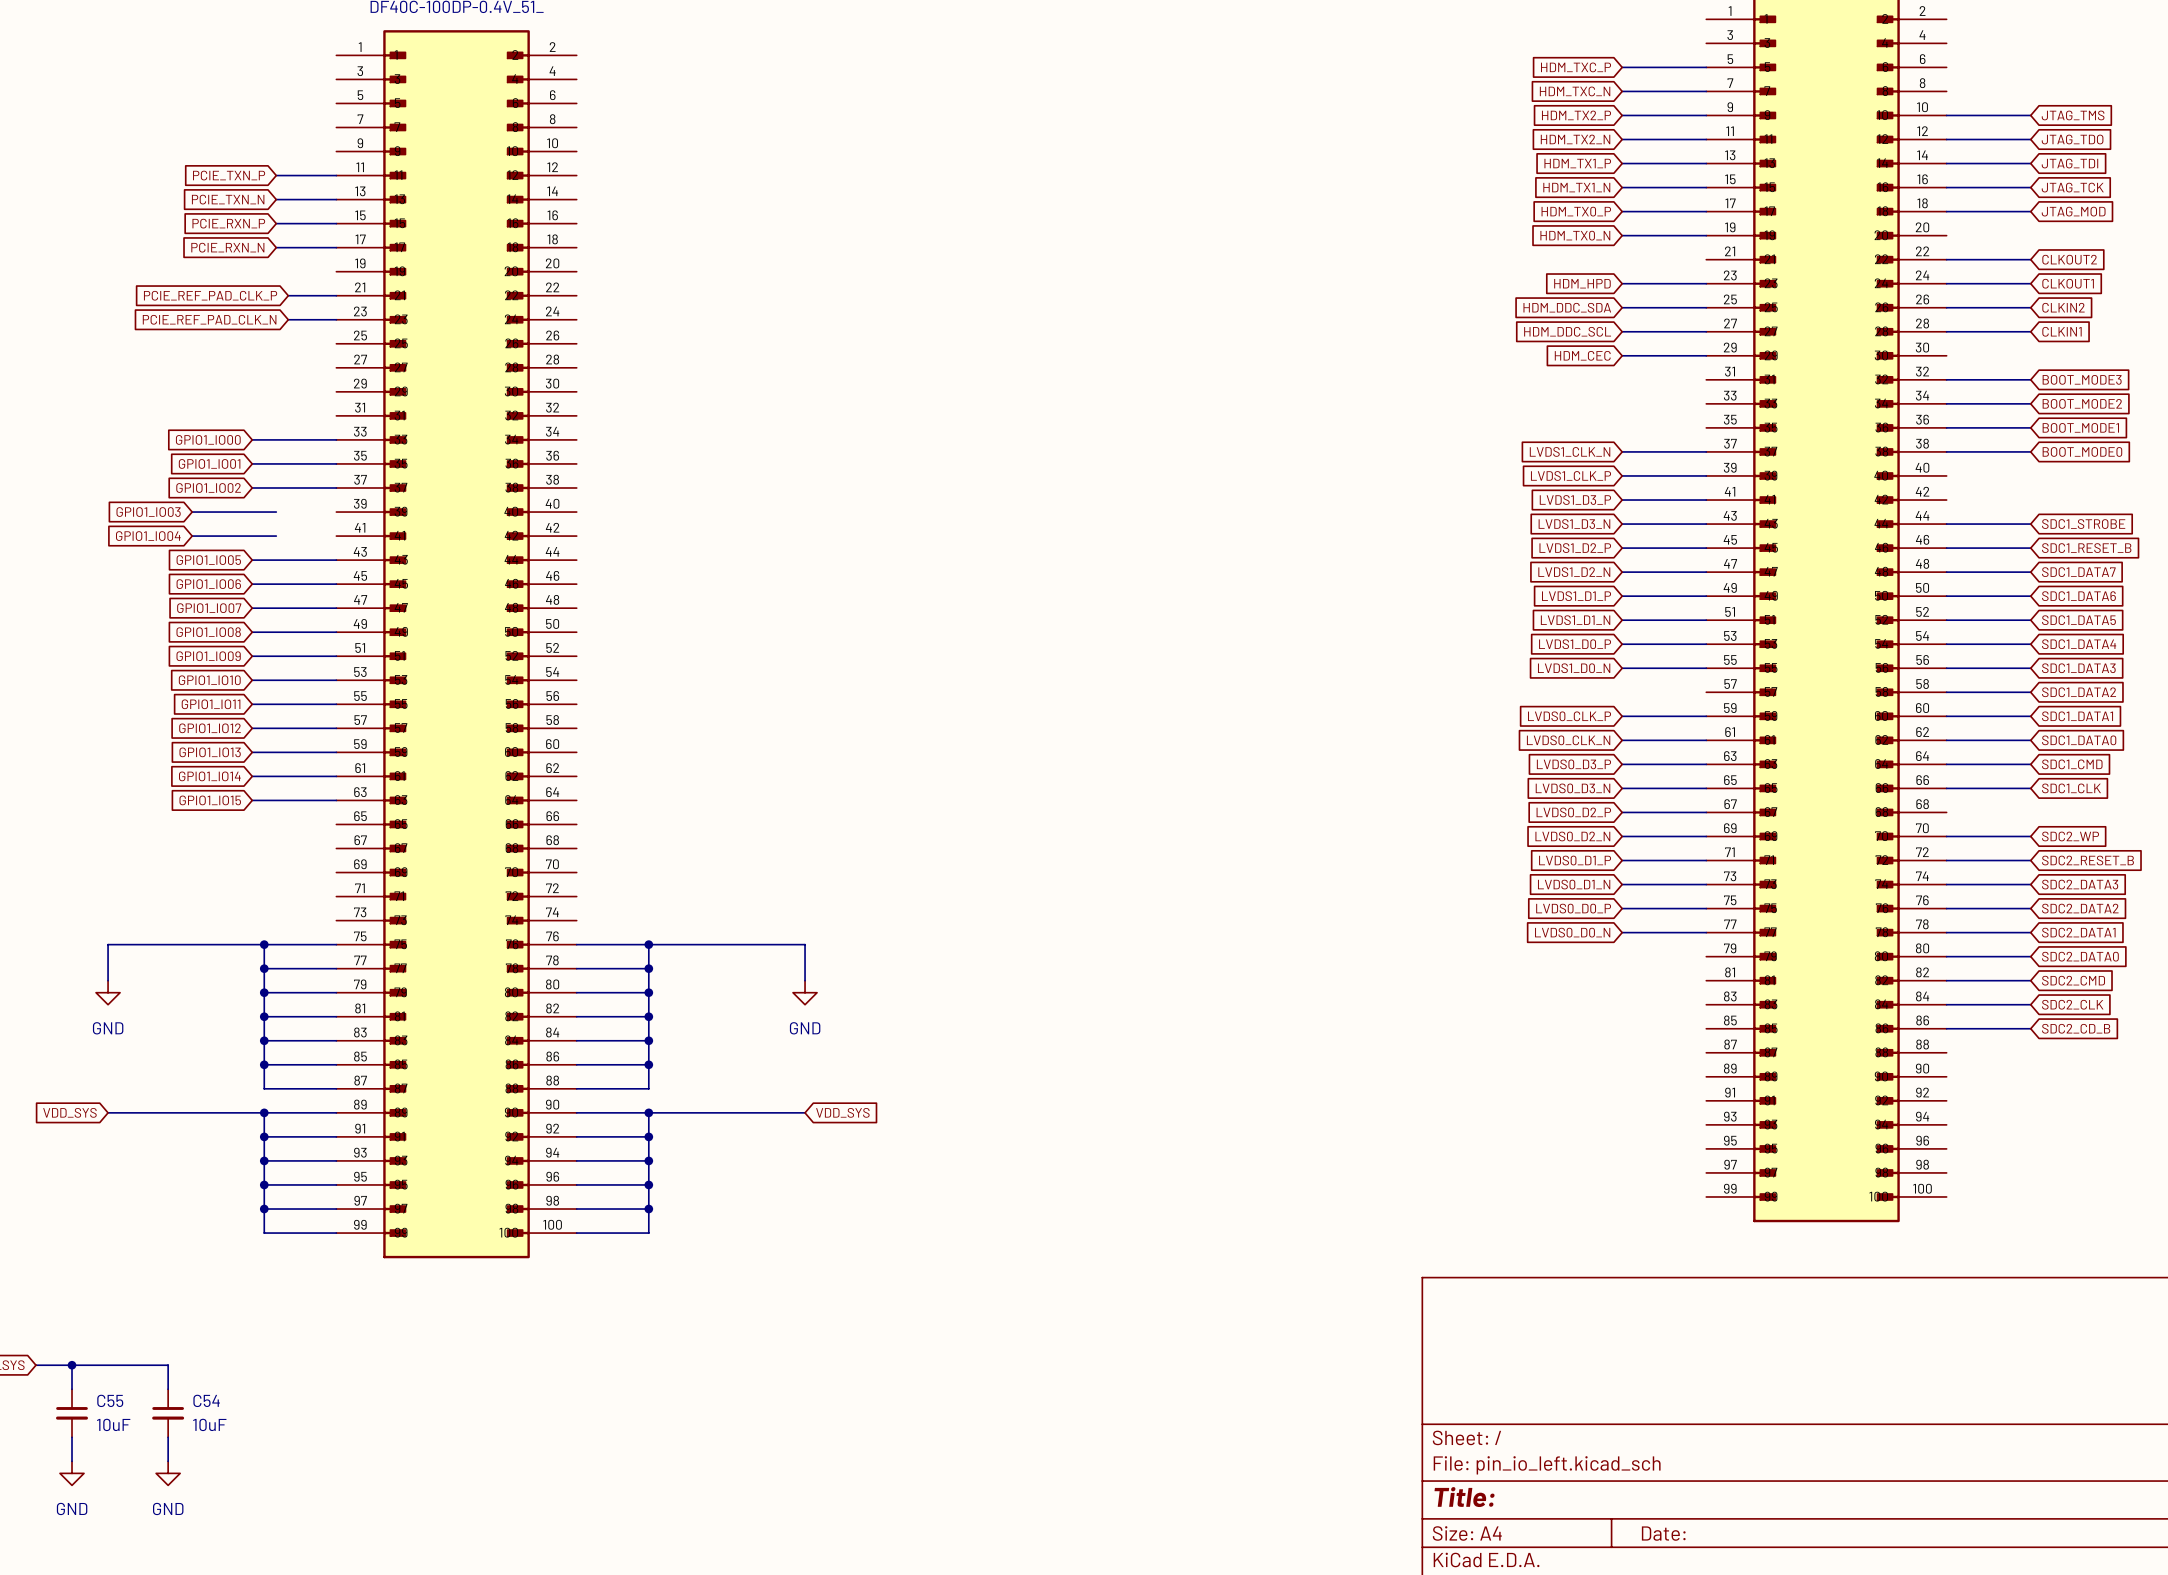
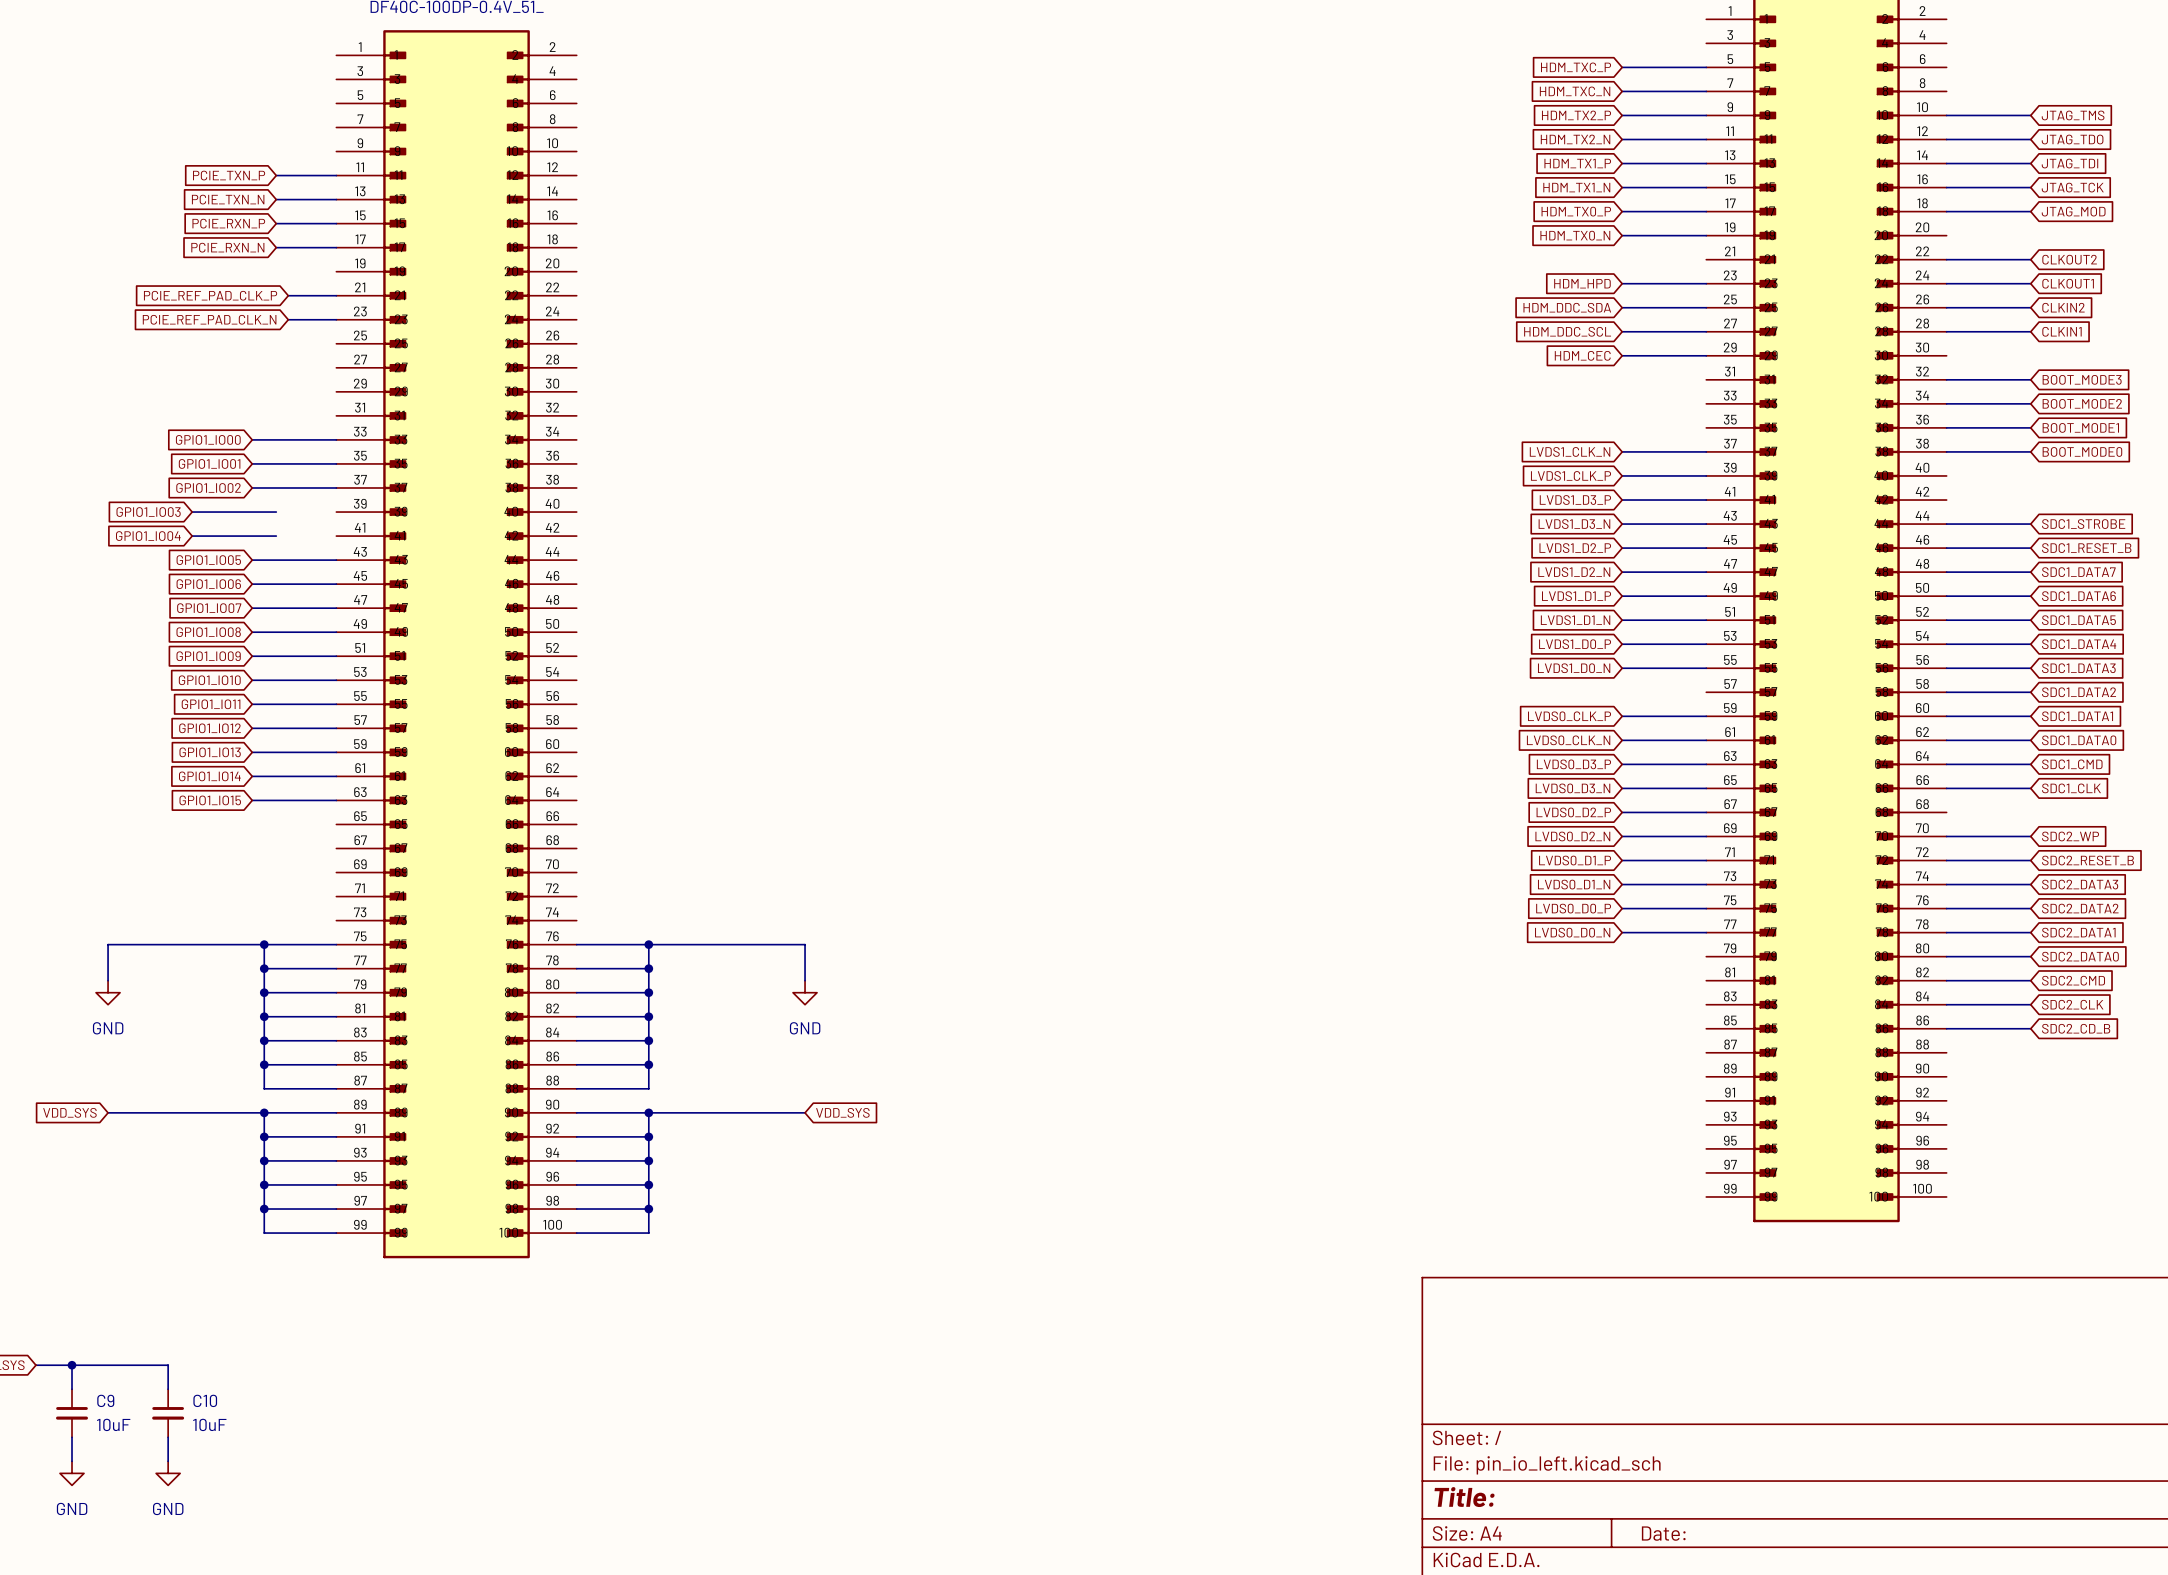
C55 name: C55 (110, 1400) -> C9 (105, 1400)
C54 name: C54 (206, 1400) -> C10 (205, 1400)

